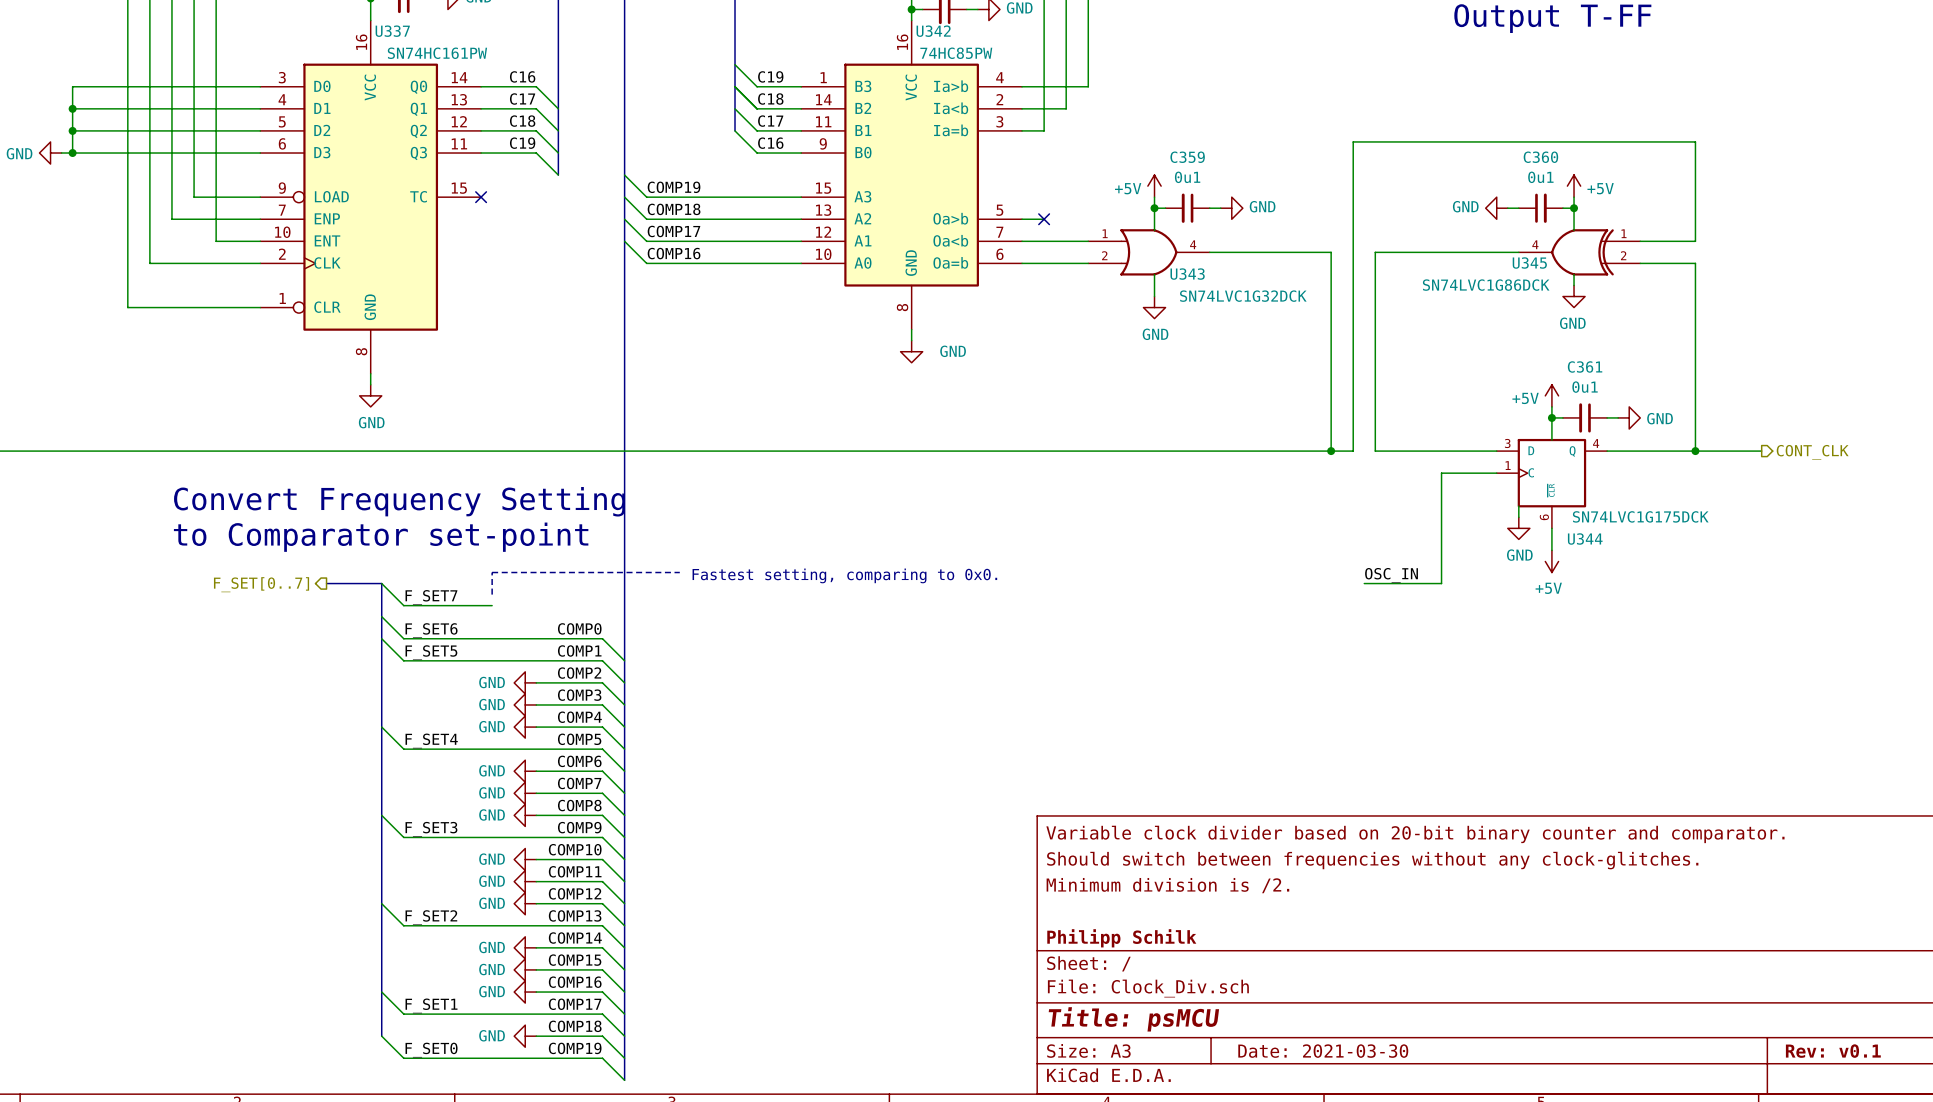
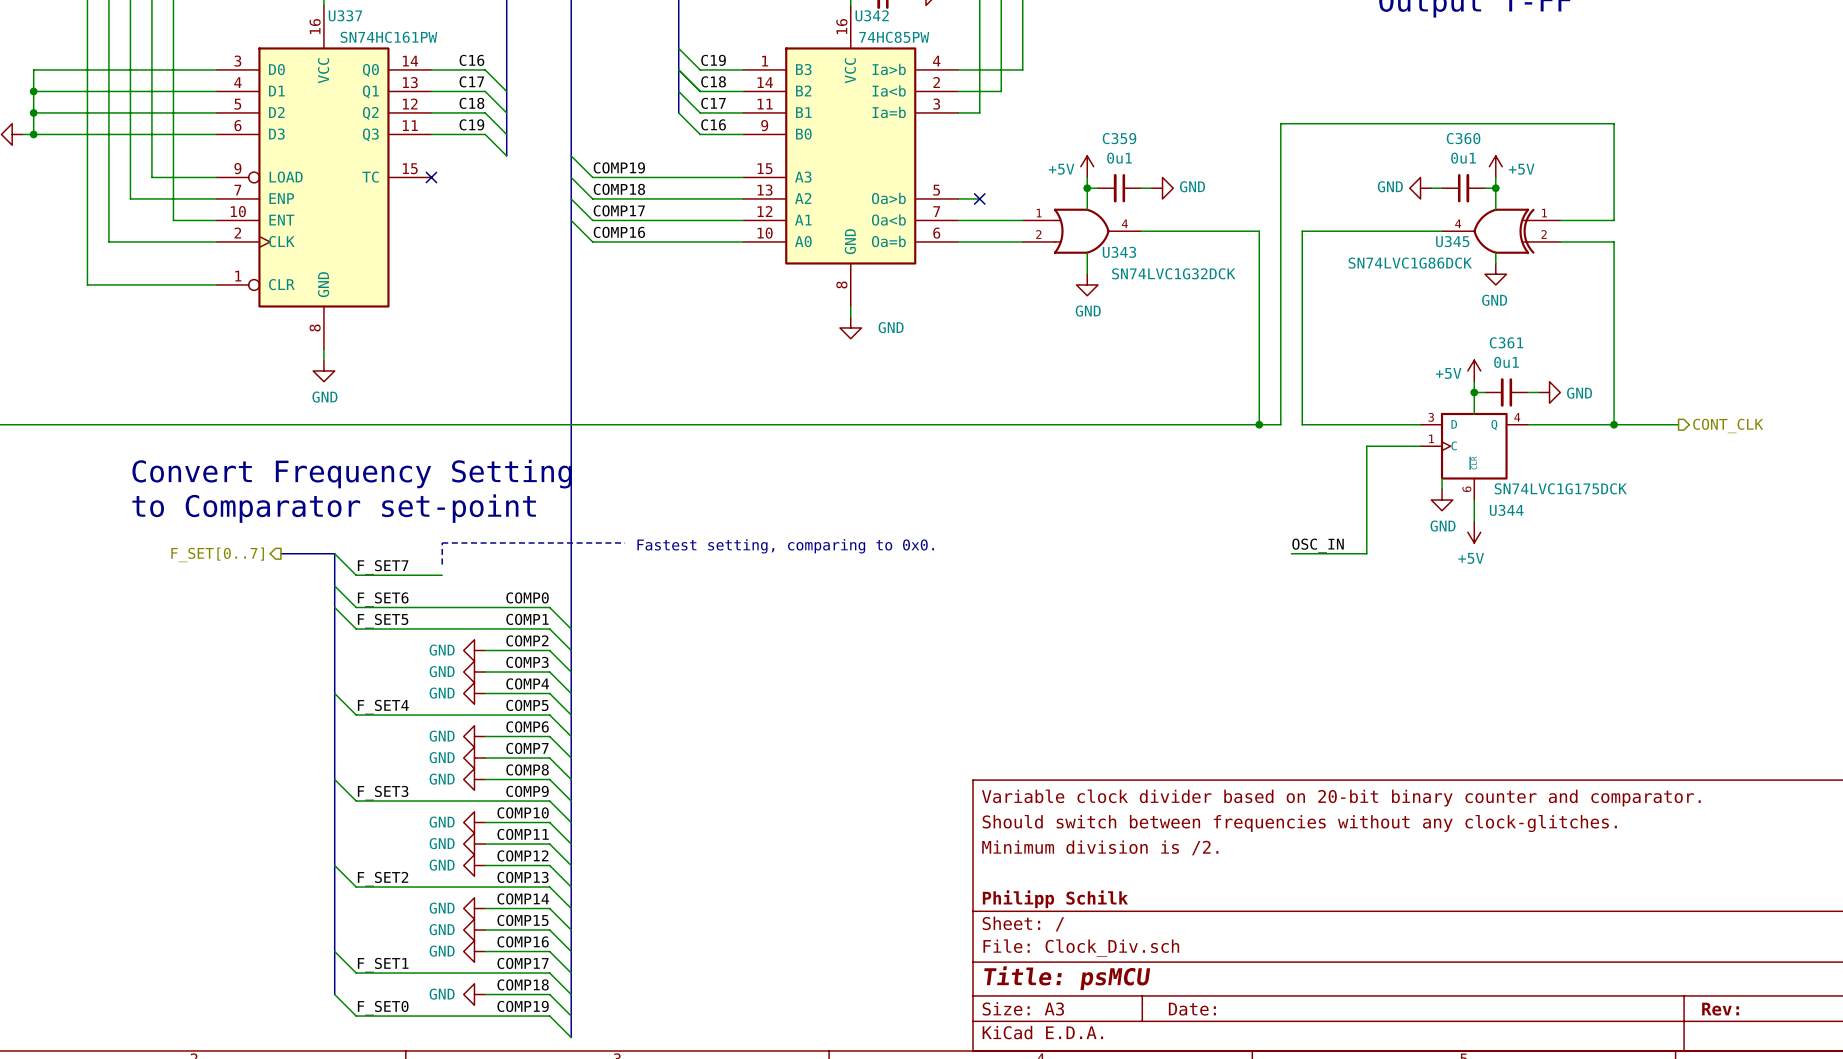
title block: Date: 2021-03-30 (1323, 1051) -> Date: (1192, 1009)
title block: Rev: v0.1 (1833, 1051) -> Rev: (1720, 1009)

